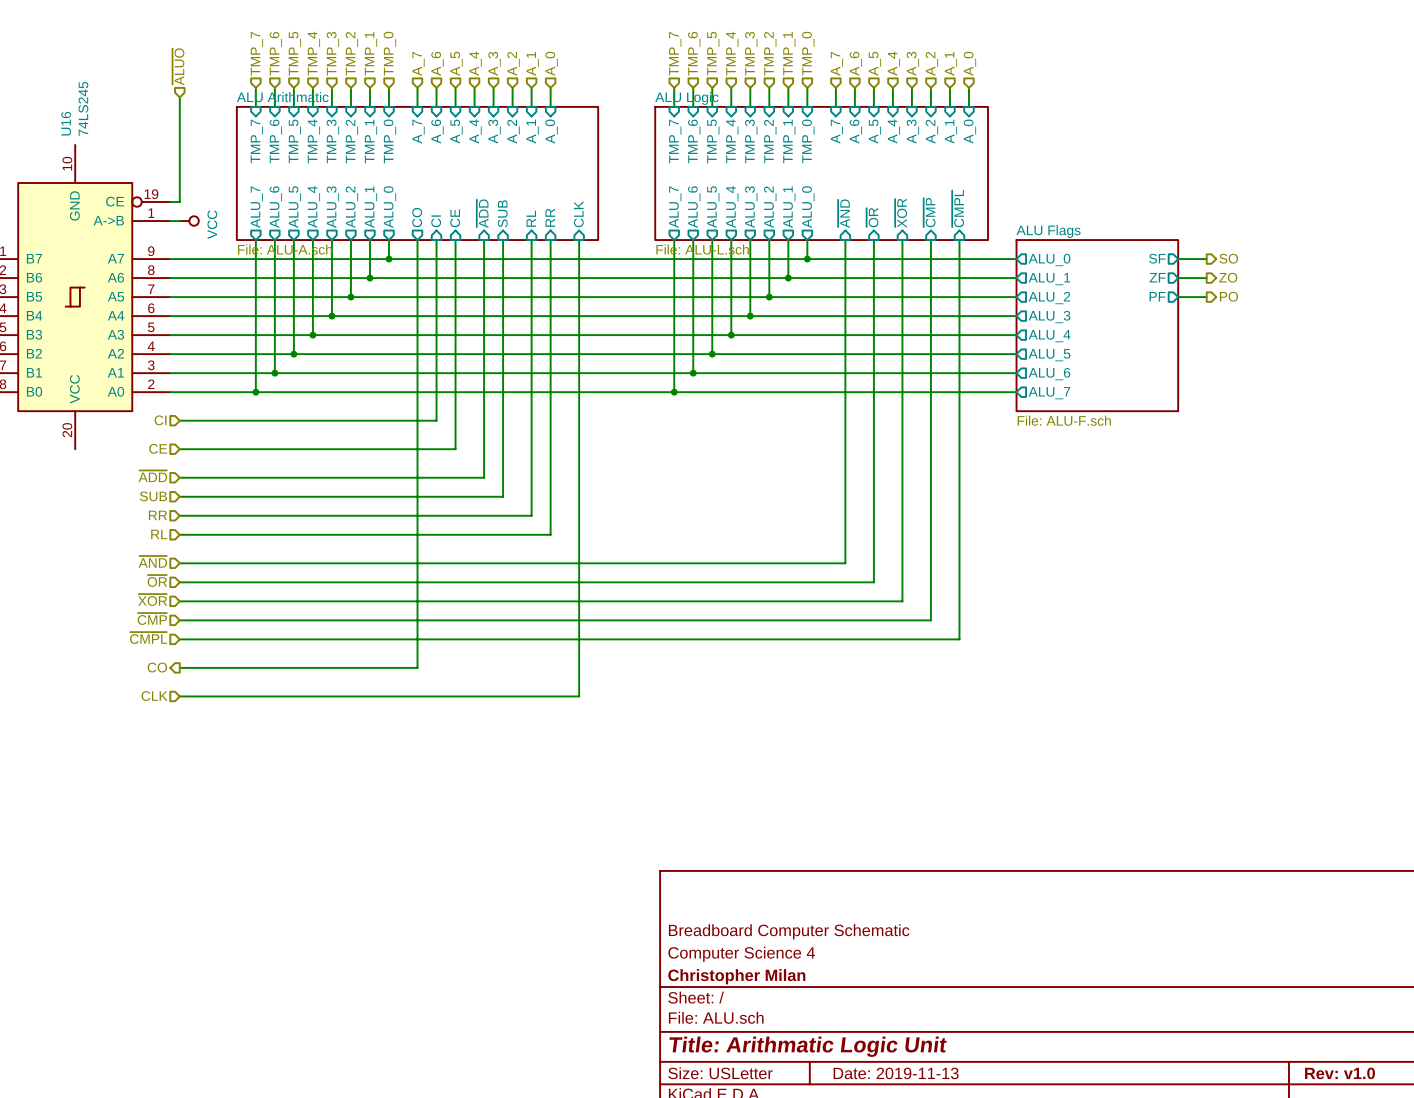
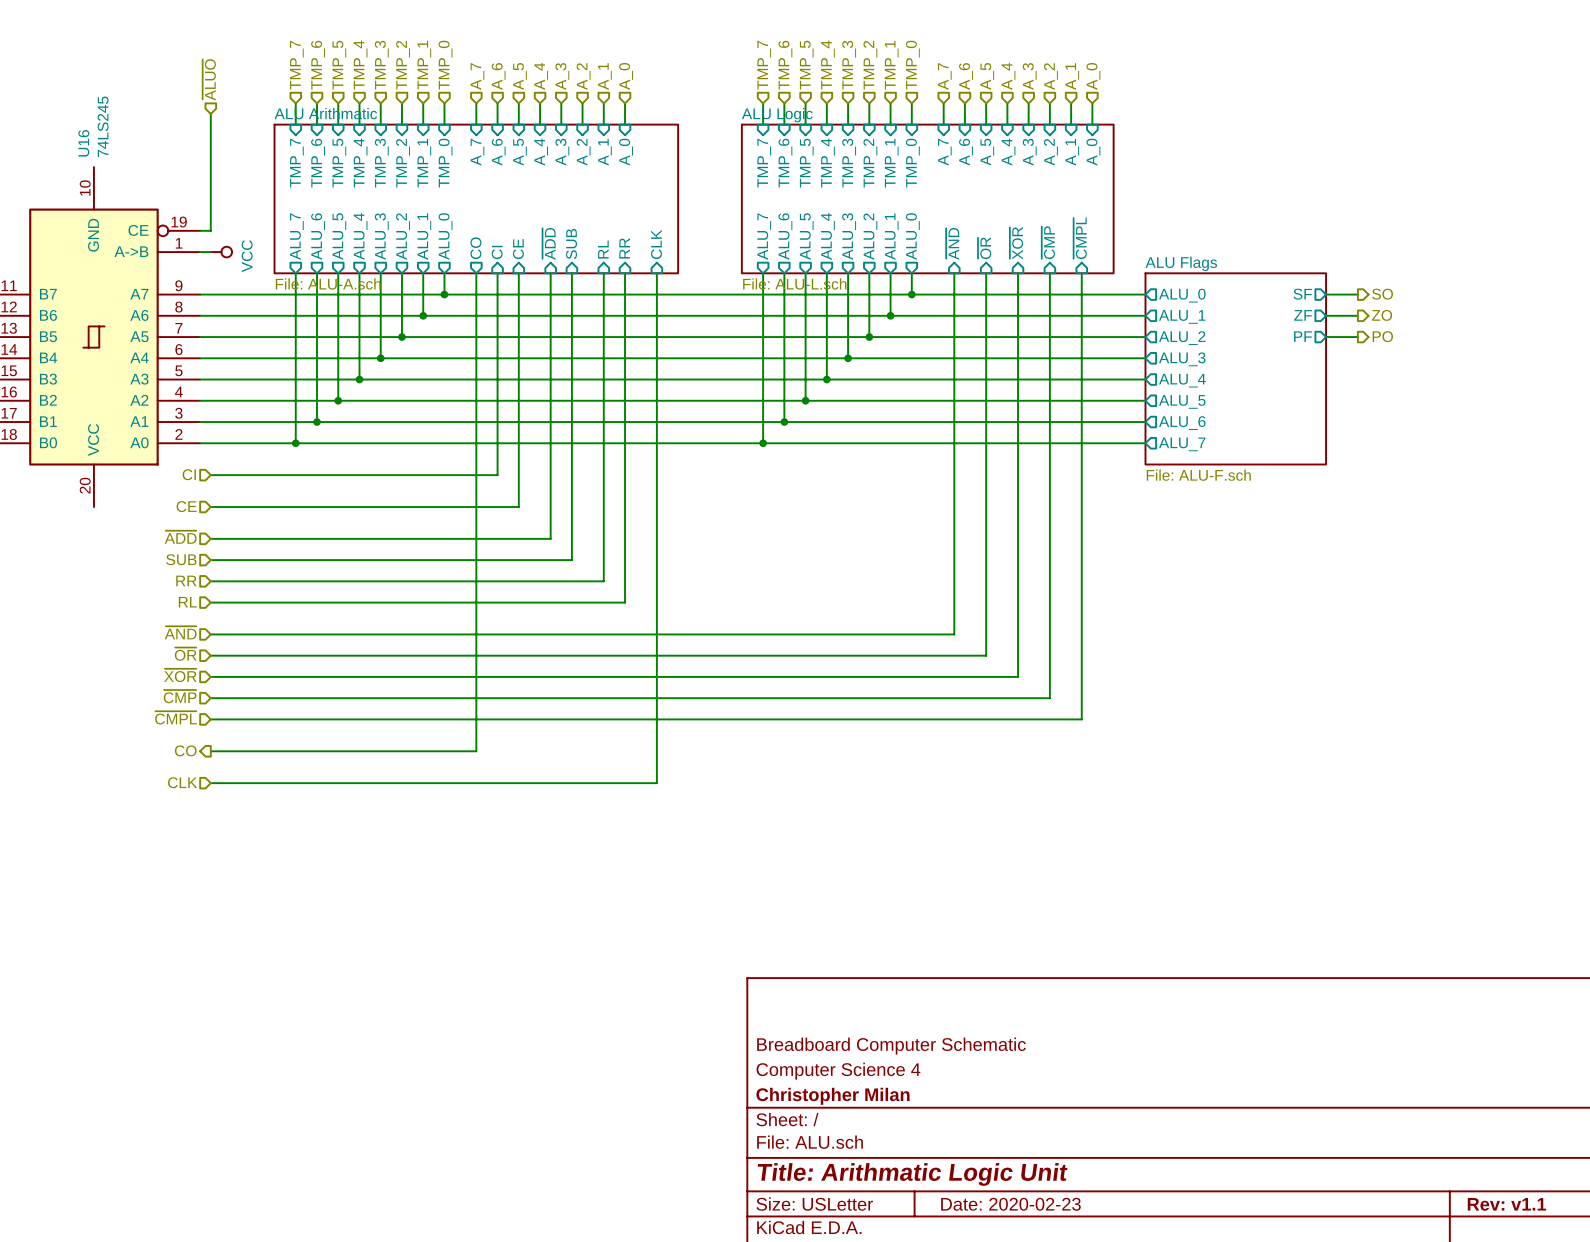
title block: Date: 2019-11-13 (896, 1073) -> Date: 2020-02-23 (1010, 1204)
title block: Rev: v1.0 (1340, 1073) -> Rev: v1.1 (1506, 1204)

